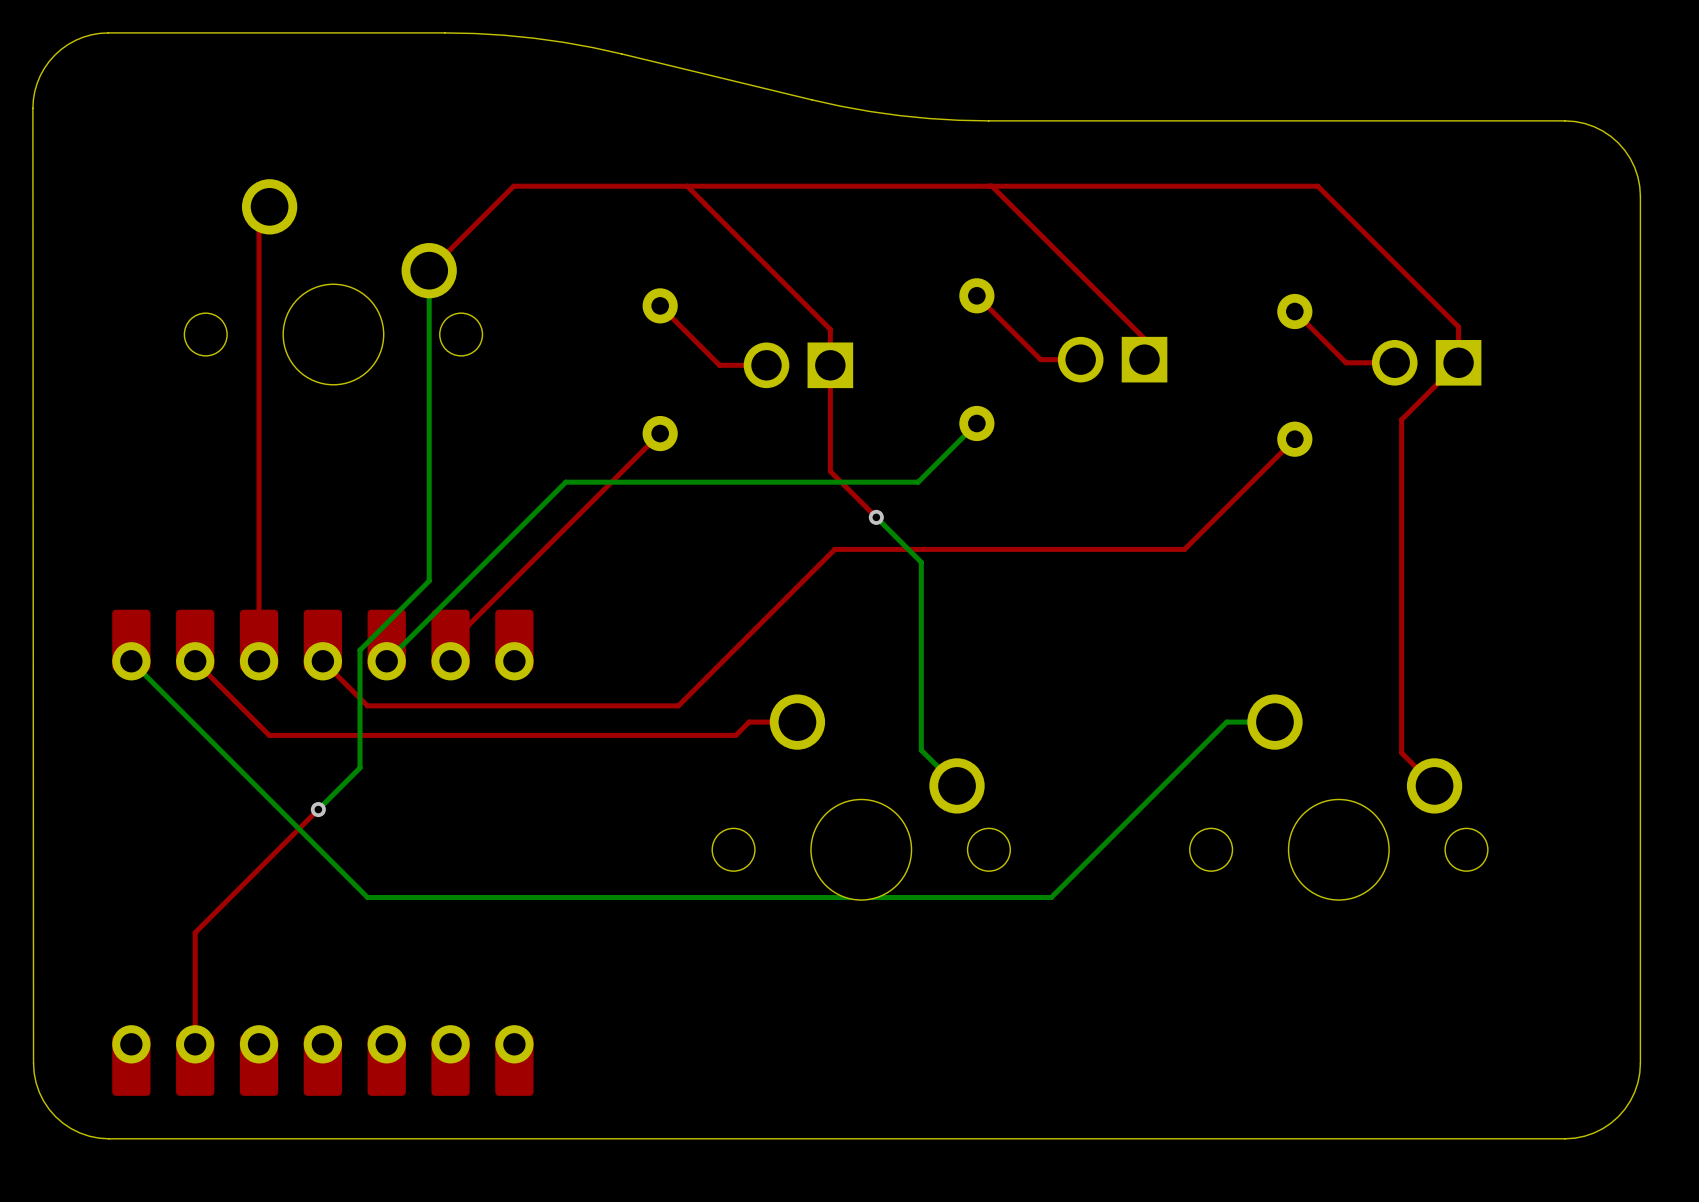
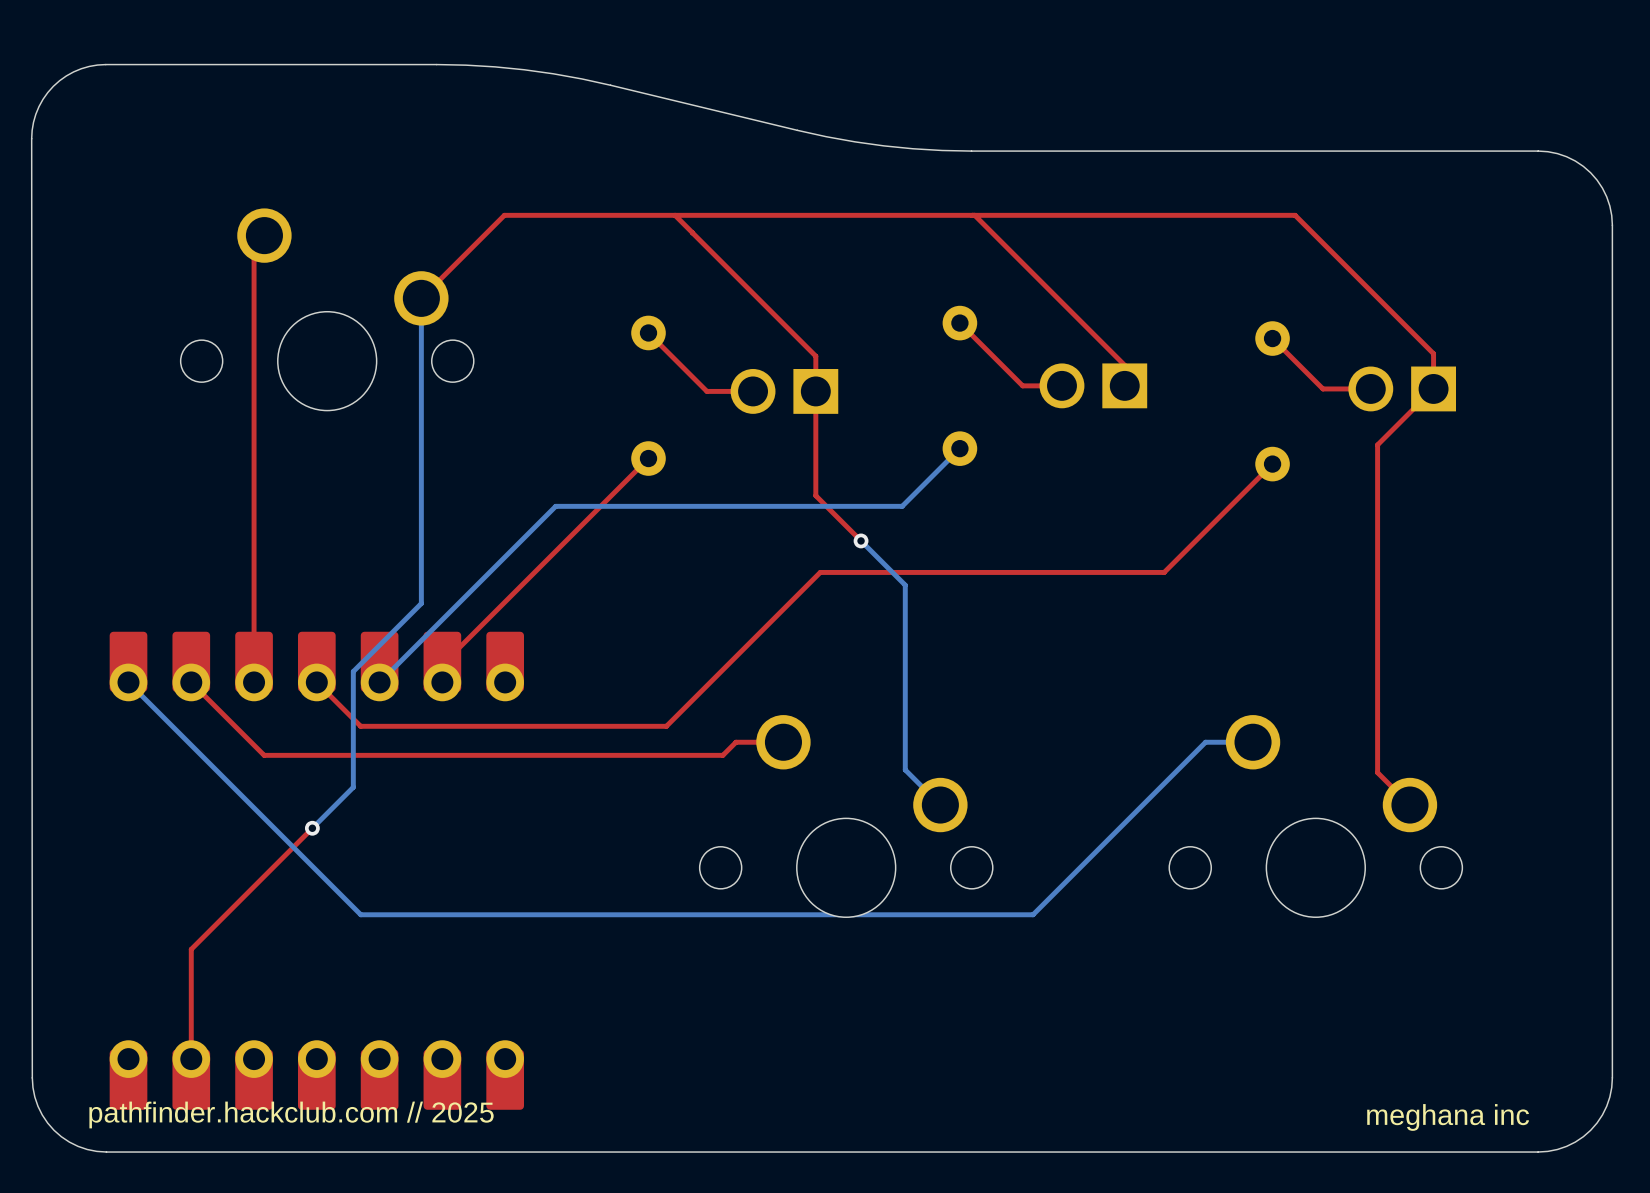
text: none -> pathfinder.hackclub.com // 2025 (291, 1114)
text: none -> meghana inc (1448, 1117)

